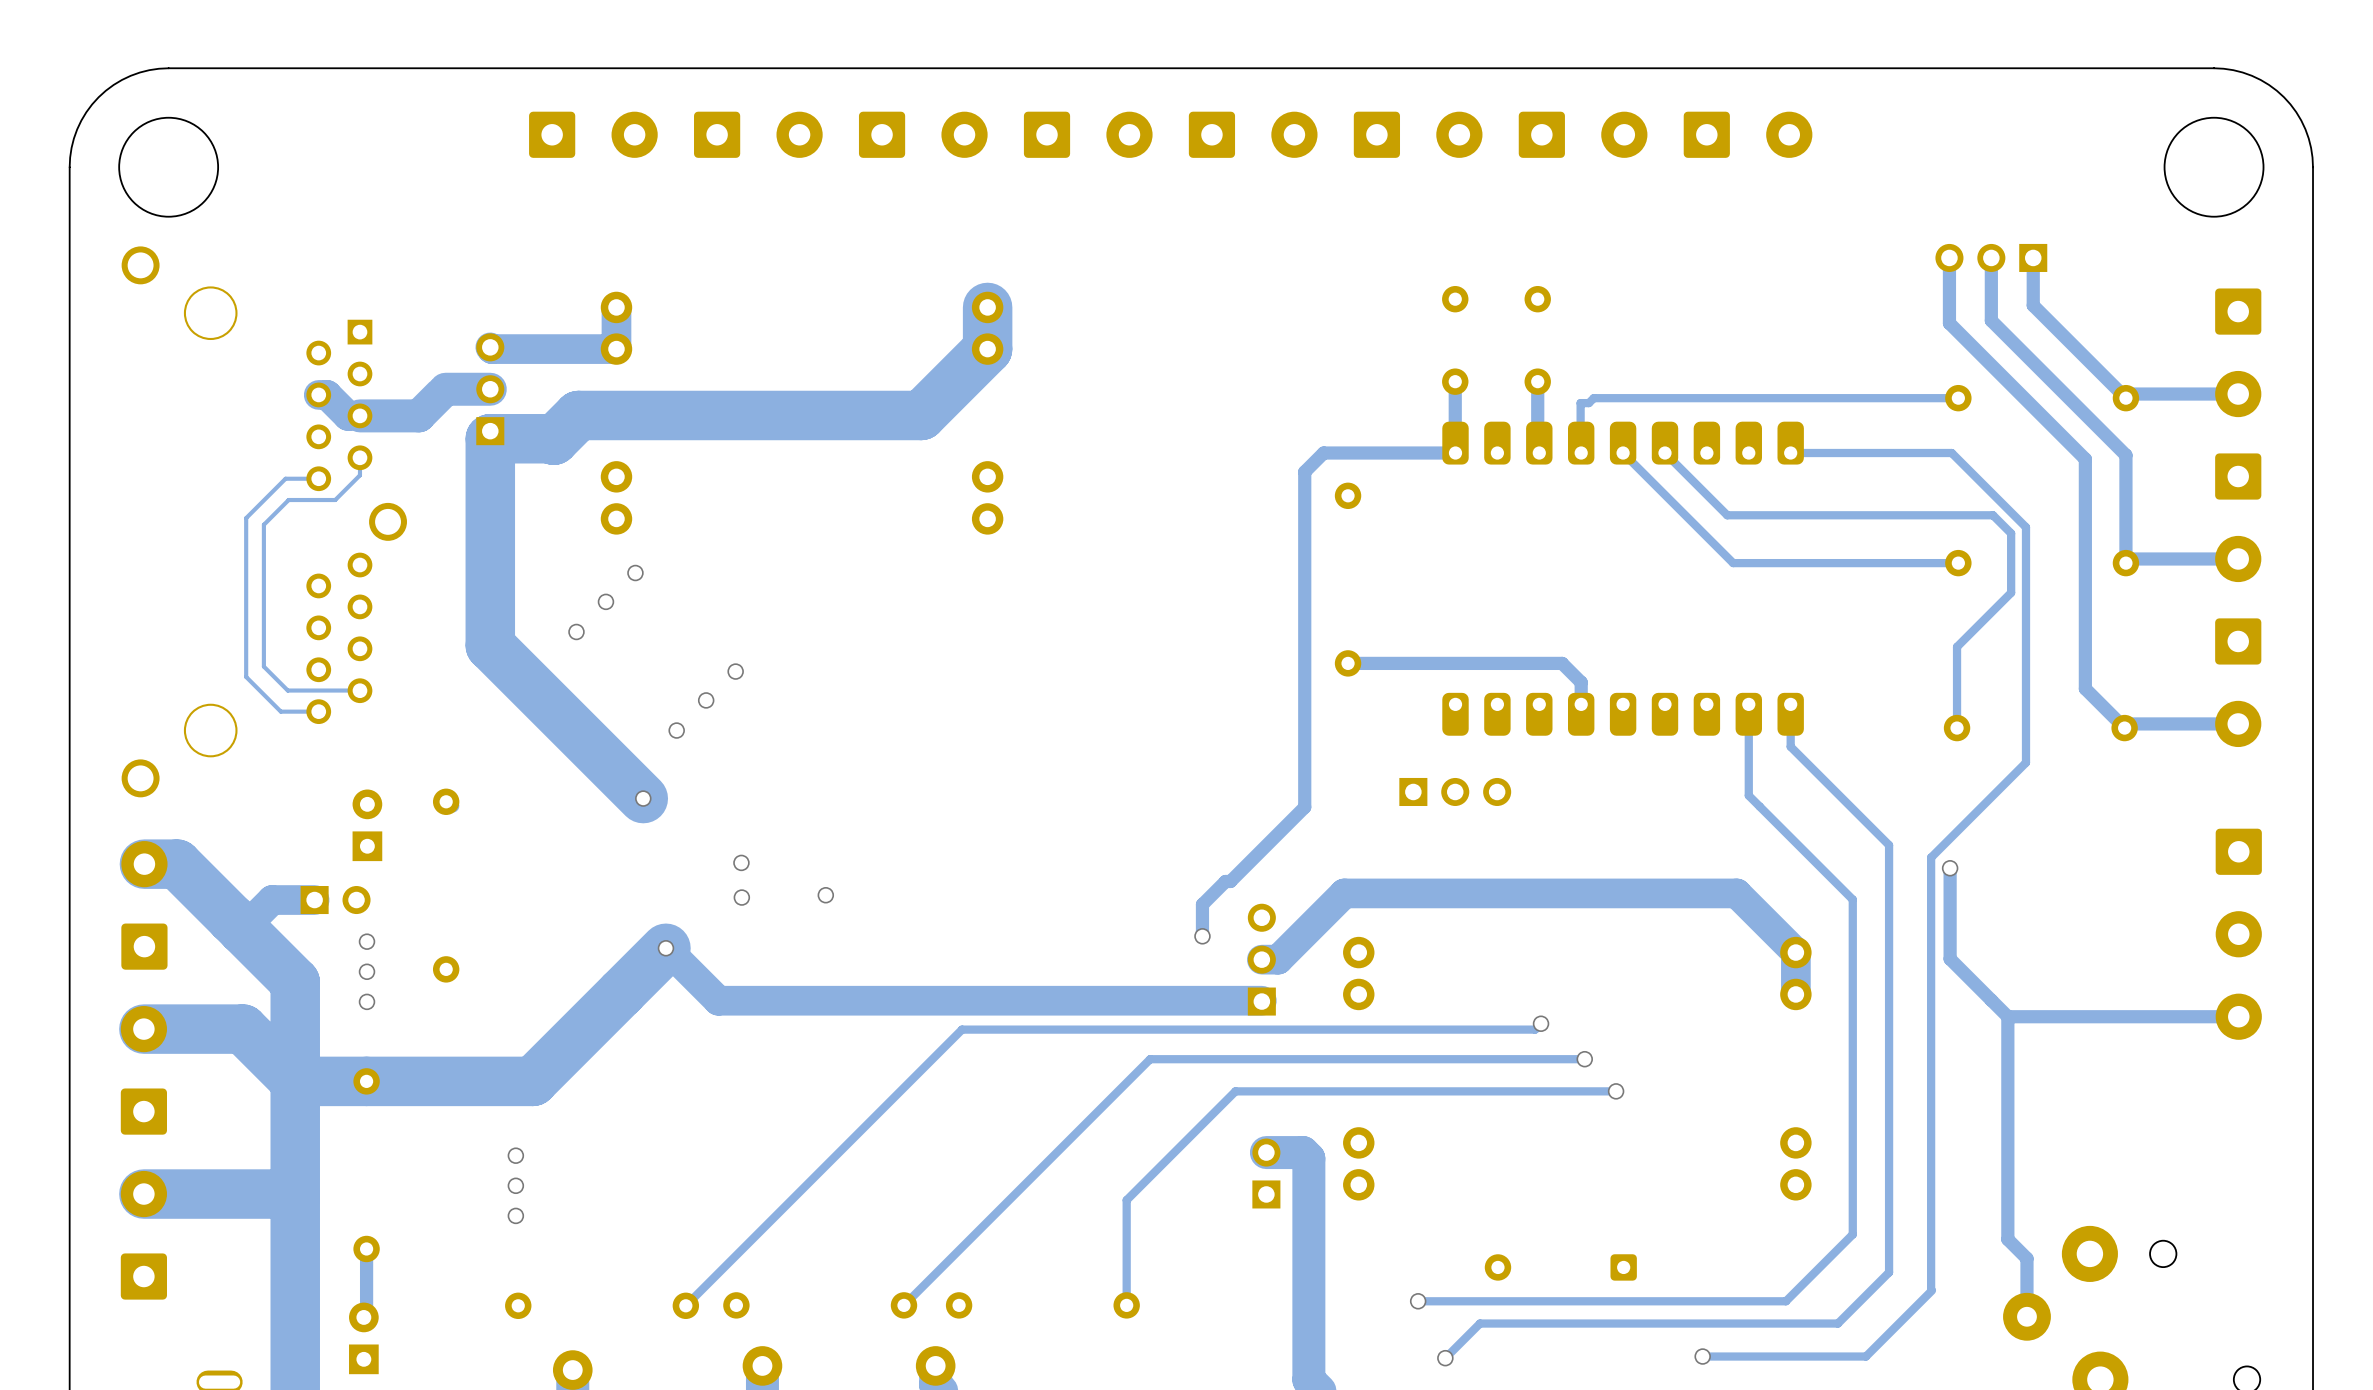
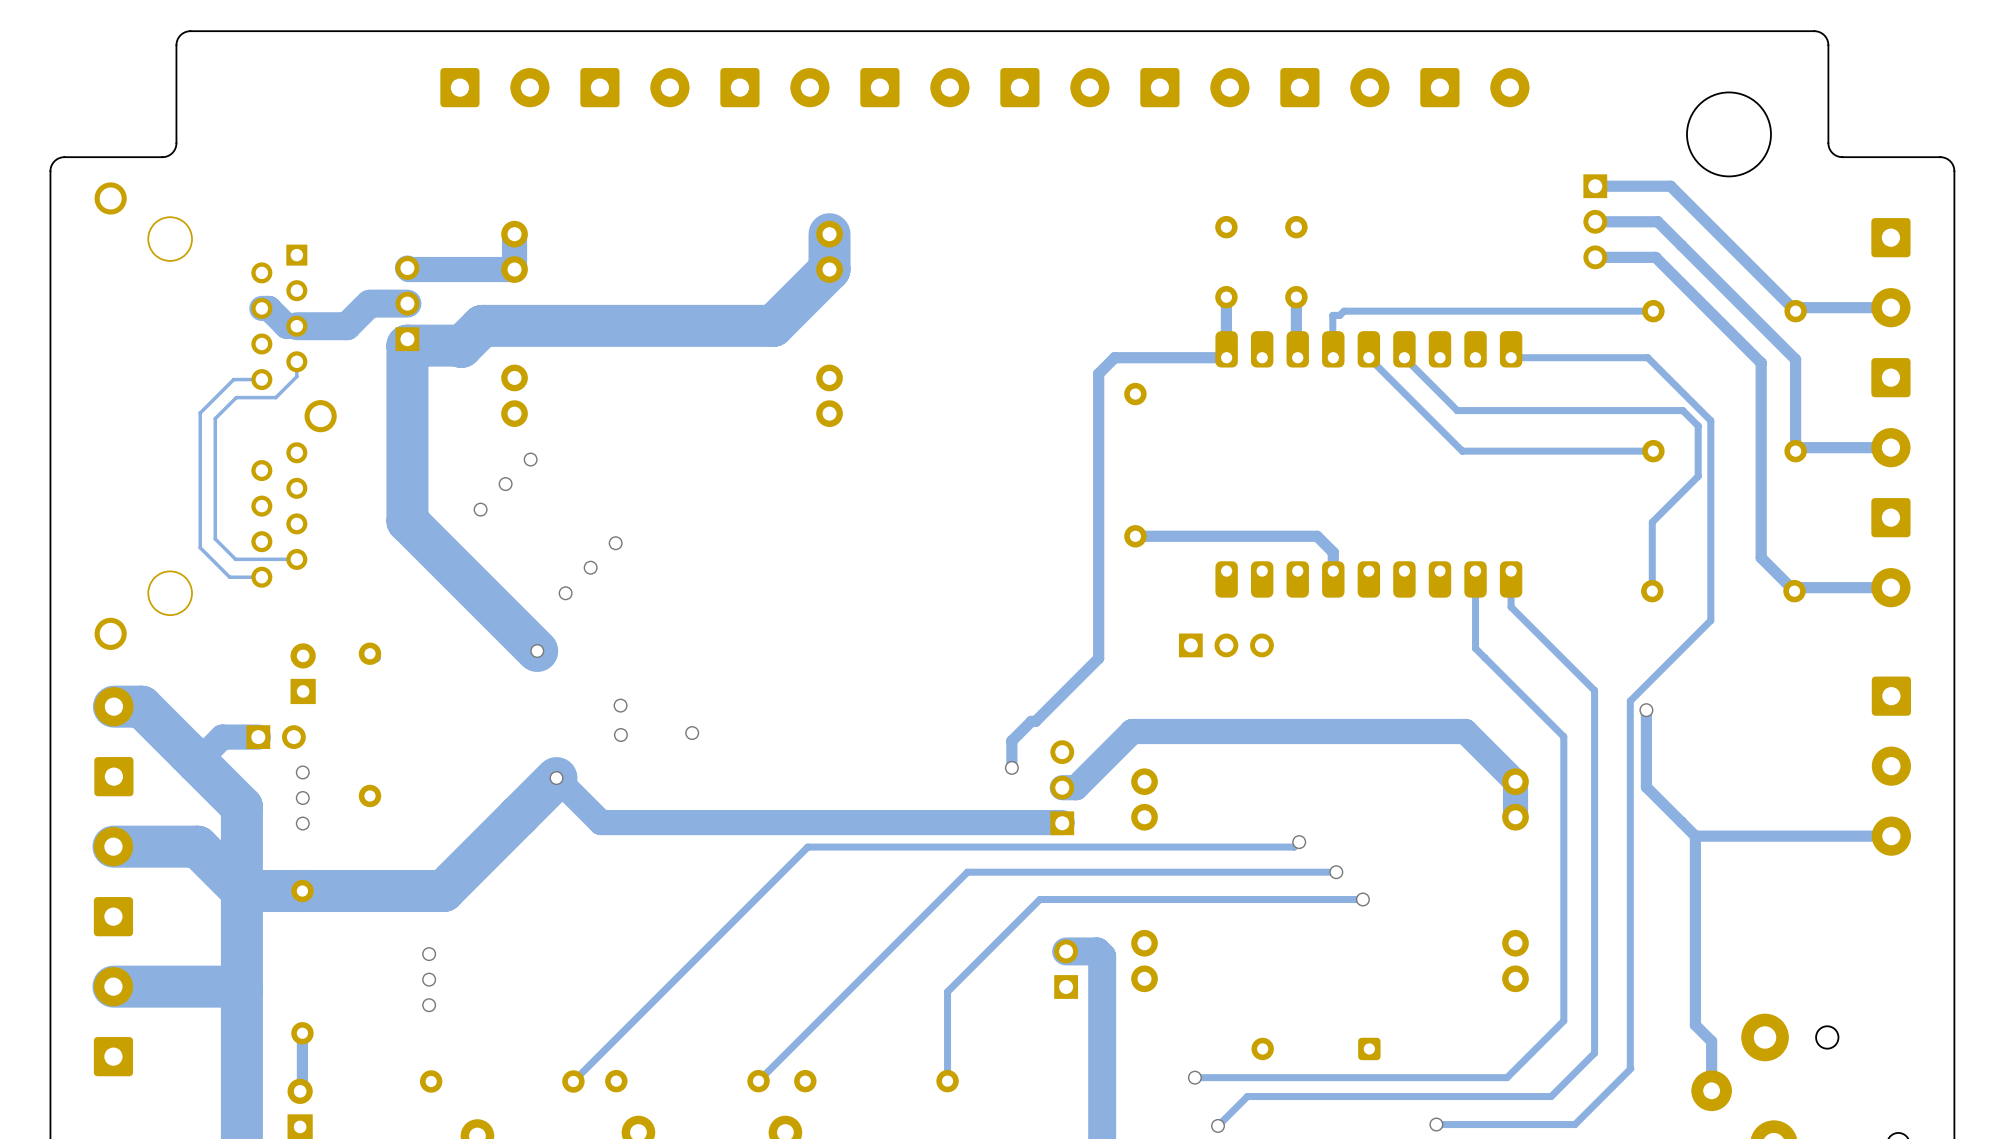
board edge: (234, 68) (149, 70) (121, 79) (98, 97) (81, 120) (71, 147) (69, 233) -> (190, 31) (181, 34) (176, 43) (176, 143) (172, 153) (162, 157) (62, 157) (53, 162) (50, 171)
board edge: (2148, 68) (2233, 70) (2260, 79) (2284, 97) (2301, 120) (2311, 147) (2313, 233) -> (1814, 31) (1822, 34) (1828, 43) (1828, 143) (1832, 153) (1842, 157) (1941, 157) (1951, 162) (1954, 171)
round board edge: [118, 117, 219, 218] -> none
round board edge position: (2214, 167) -> (1728, 134)
track: (1949, 257) (1949, 323) (1960, 334) -> (1595, 257) (1655, 257)
track: (1991, 257) (1991, 320) -> (1595, 221) (1657, 221) (1681, 245)
part rotation: 0° (1991, 257) -> 90° counterclockwise (1595, 221)
part position: (1991, 257) -> (1595, 221)
track: (2033, 257) (2033, 305) -> (1595, 186) (1670, 186) (1716, 232)

